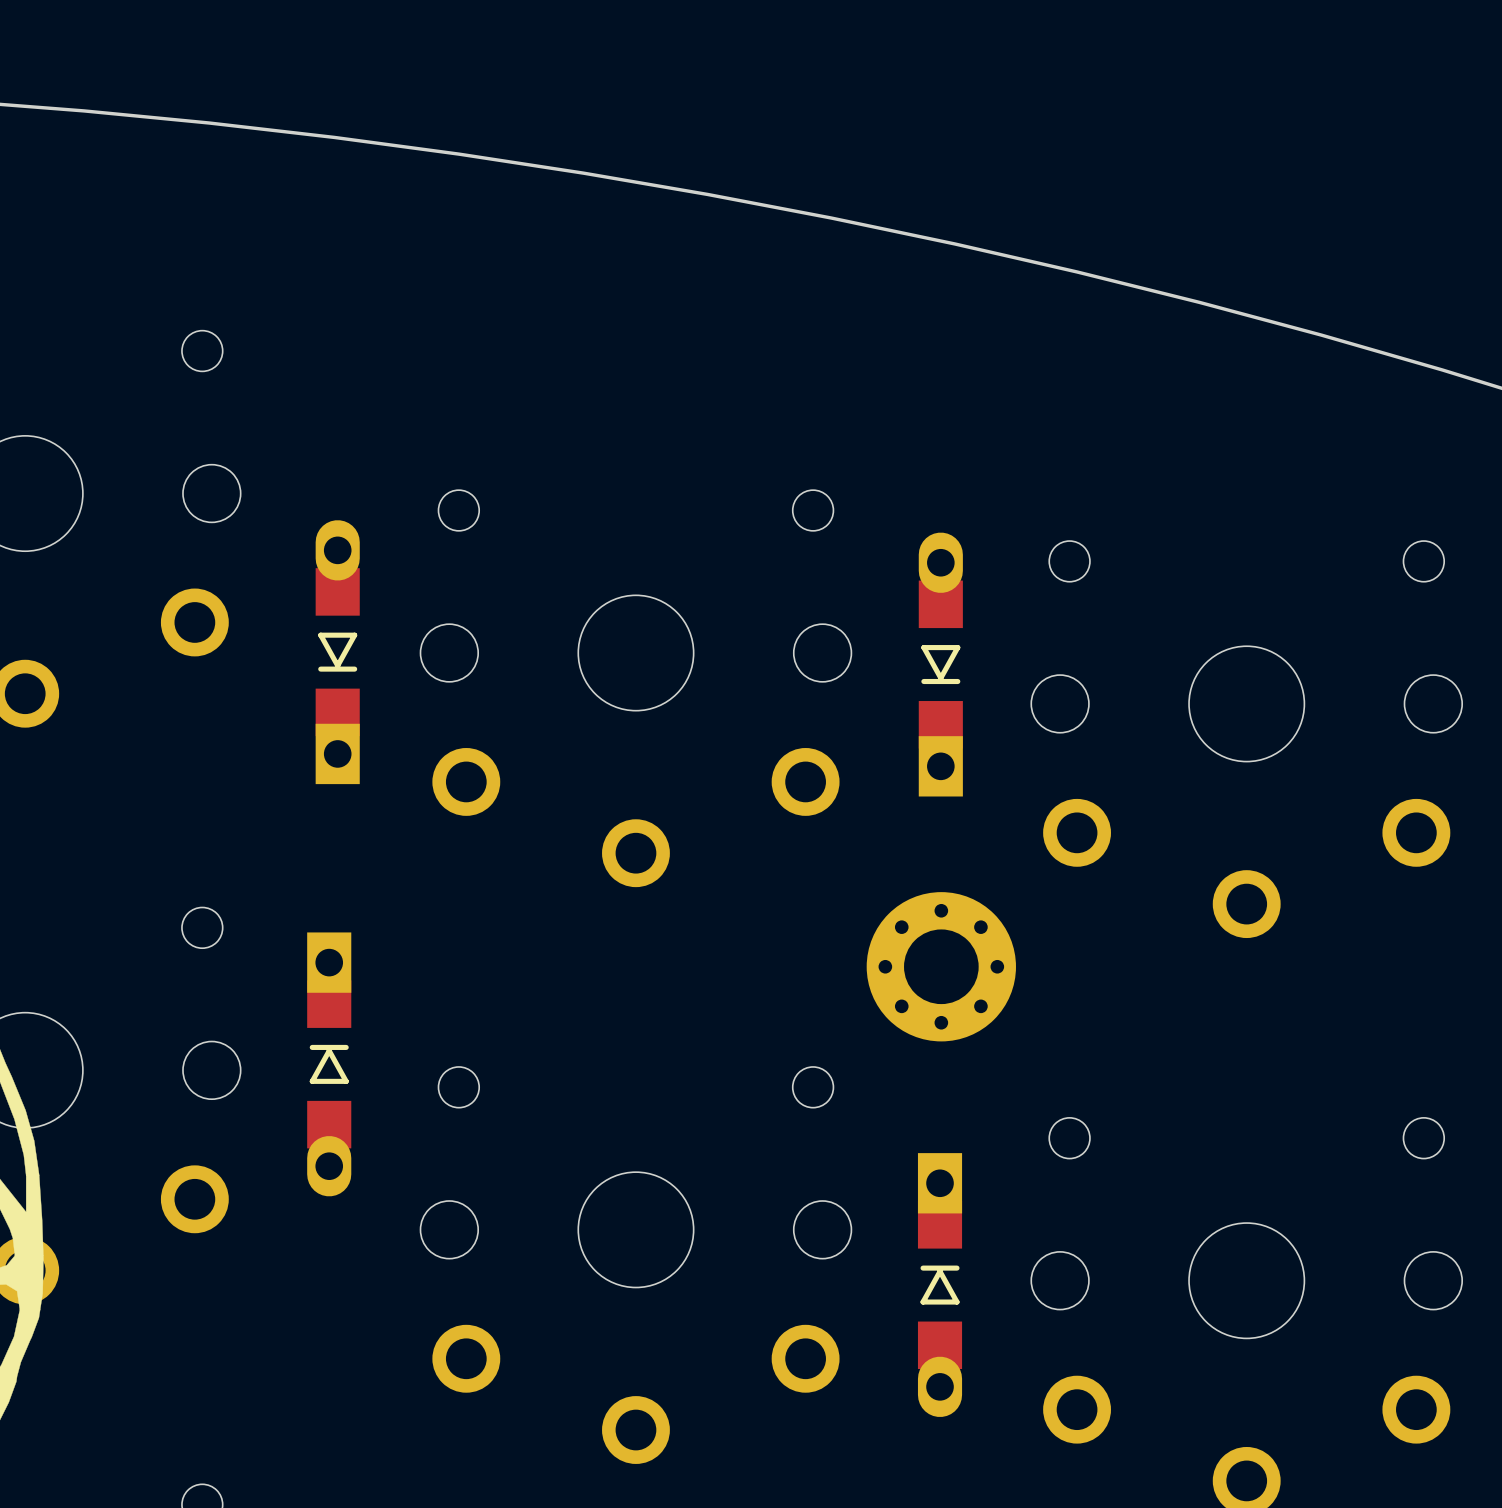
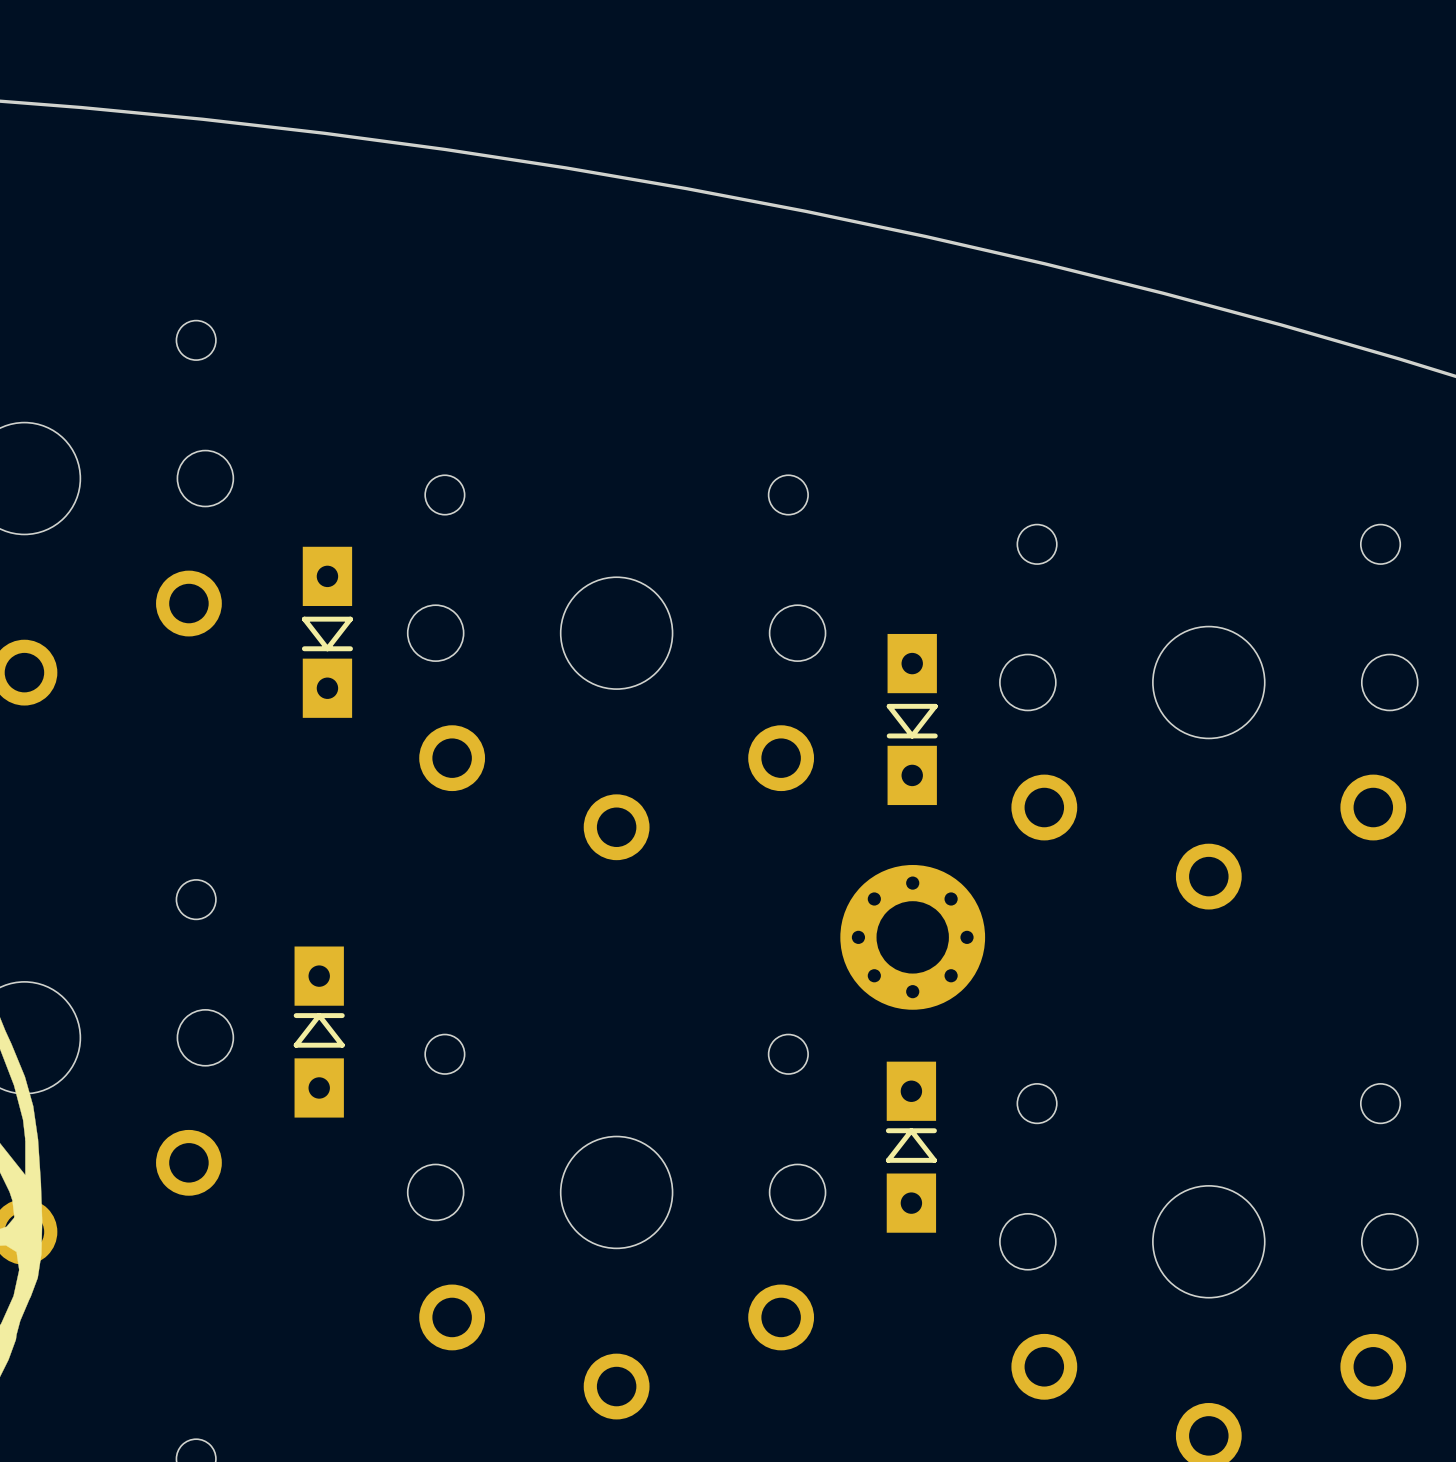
part footprint: [315, 520, 360, 785] -> [301, 546, 353, 718]
part: (940, 664) -> none
part: none -> (912, 719)
part footprint: [307, 932, 352, 1197] -> [293, 946, 345, 1118]
part: none -> (911, 1147)
part: (940, 1285) -> none

